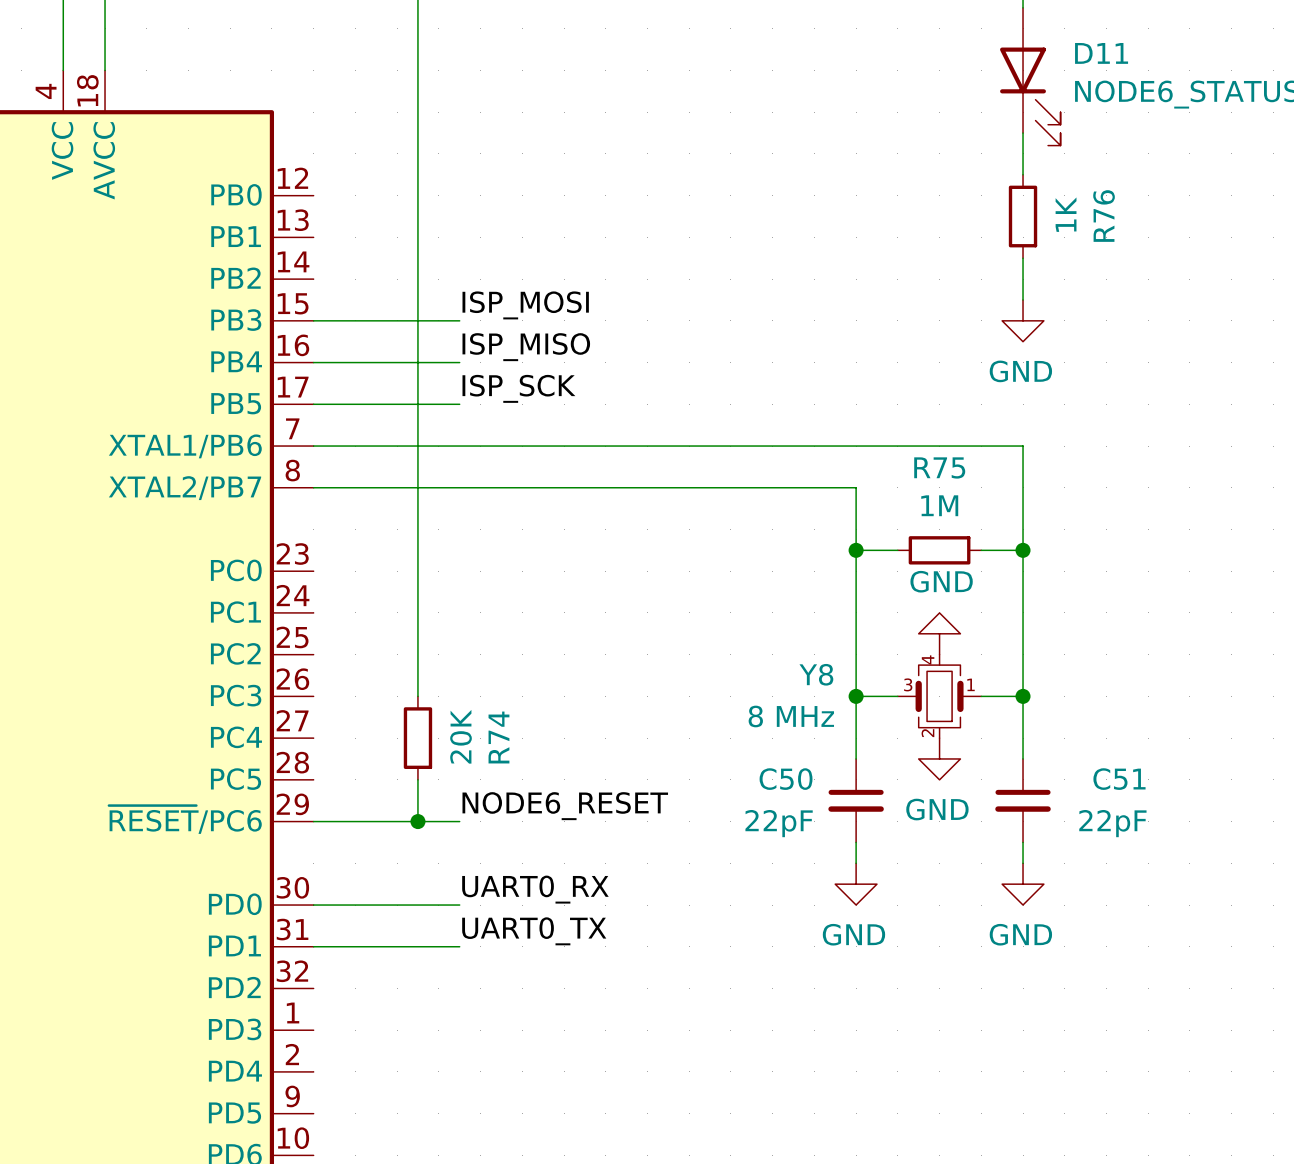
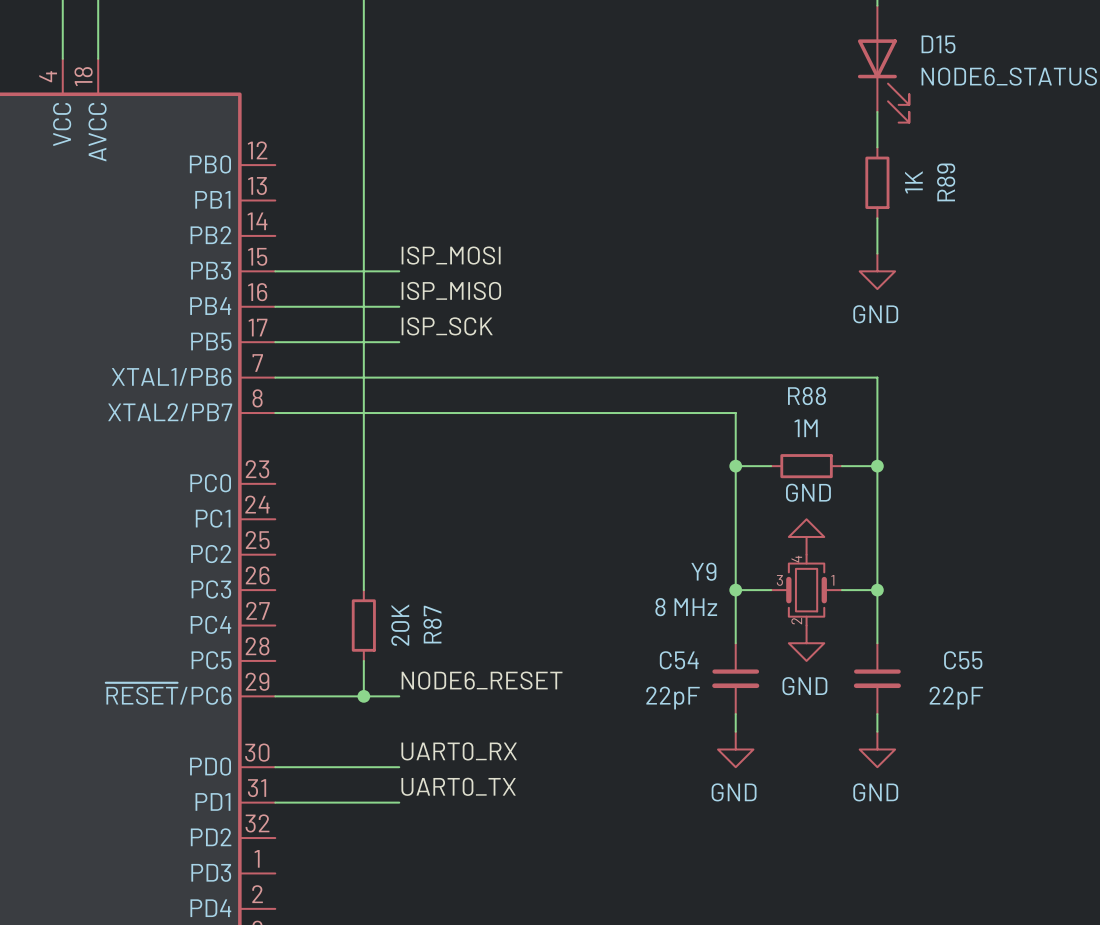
D11 name: D11 (1101, 53) -> D15 (938, 44)
R76 name: R76 (1104, 216) -> R89 (946, 182)
R75 name: R75 (939, 467) -> R88 (806, 396)
Y8 name: Y8 (816, 674) -> Y9 (703, 571)
R74 name: R74 (498, 737) -> R87 (432, 624)
C50 name: C50 (786, 779) -> C54 (679, 660)
C51 name: C51 (1119, 779) -> C55 (963, 660)

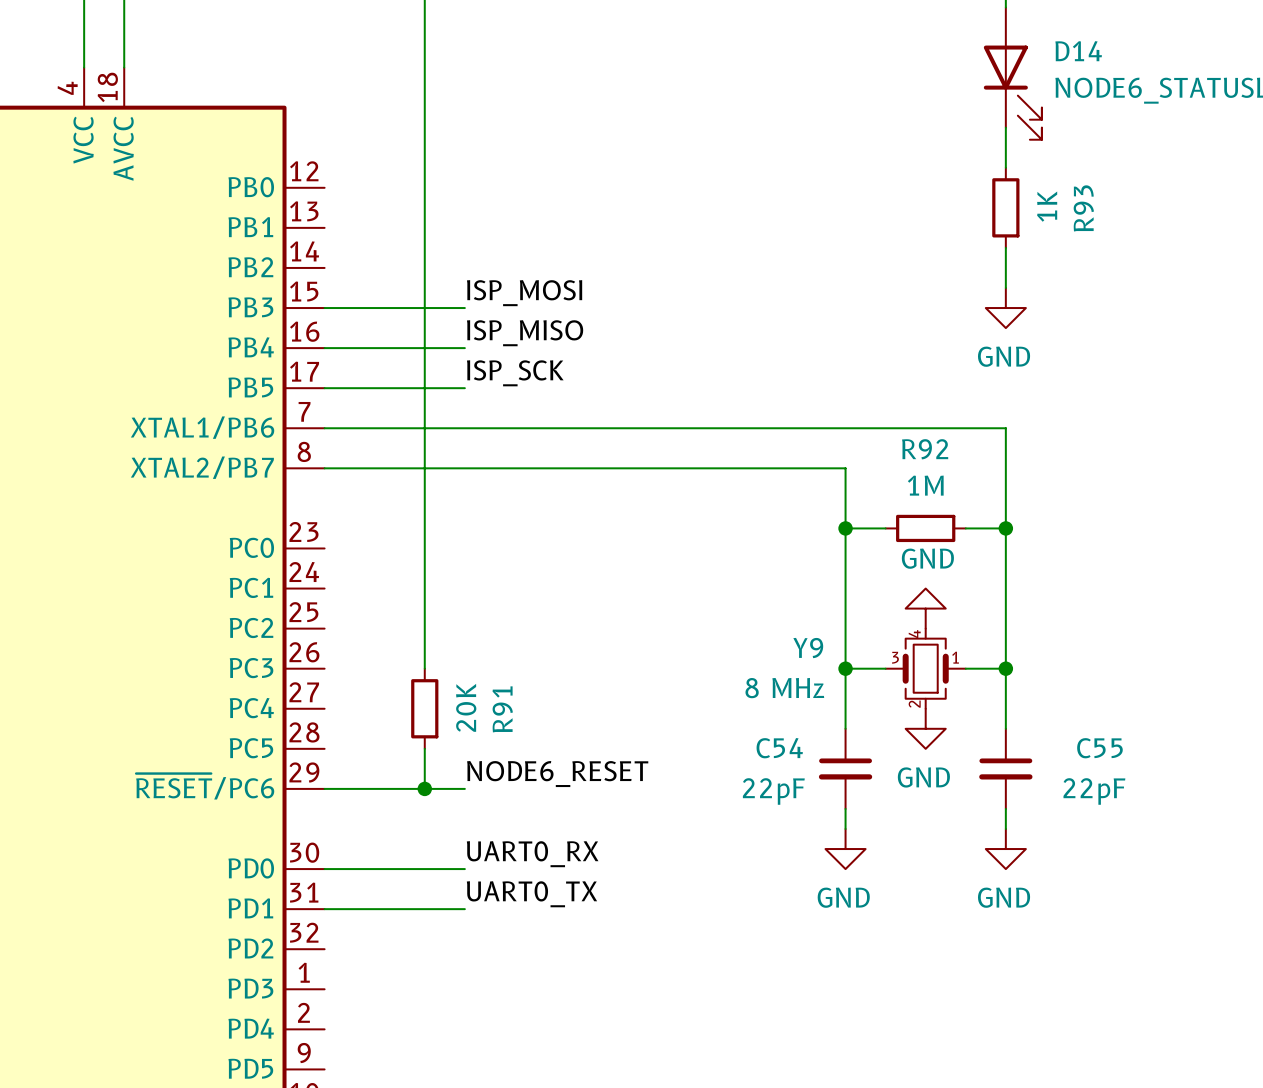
D15 name: D15 (938, 44) -> D14 (1078, 51)
R89 name: R89 (946, 182) -> R93 (1083, 208)
R88 name: R88 (806, 396) -> R92 (925, 449)
R87 name: R87 (432, 624) -> R91 (502, 709)

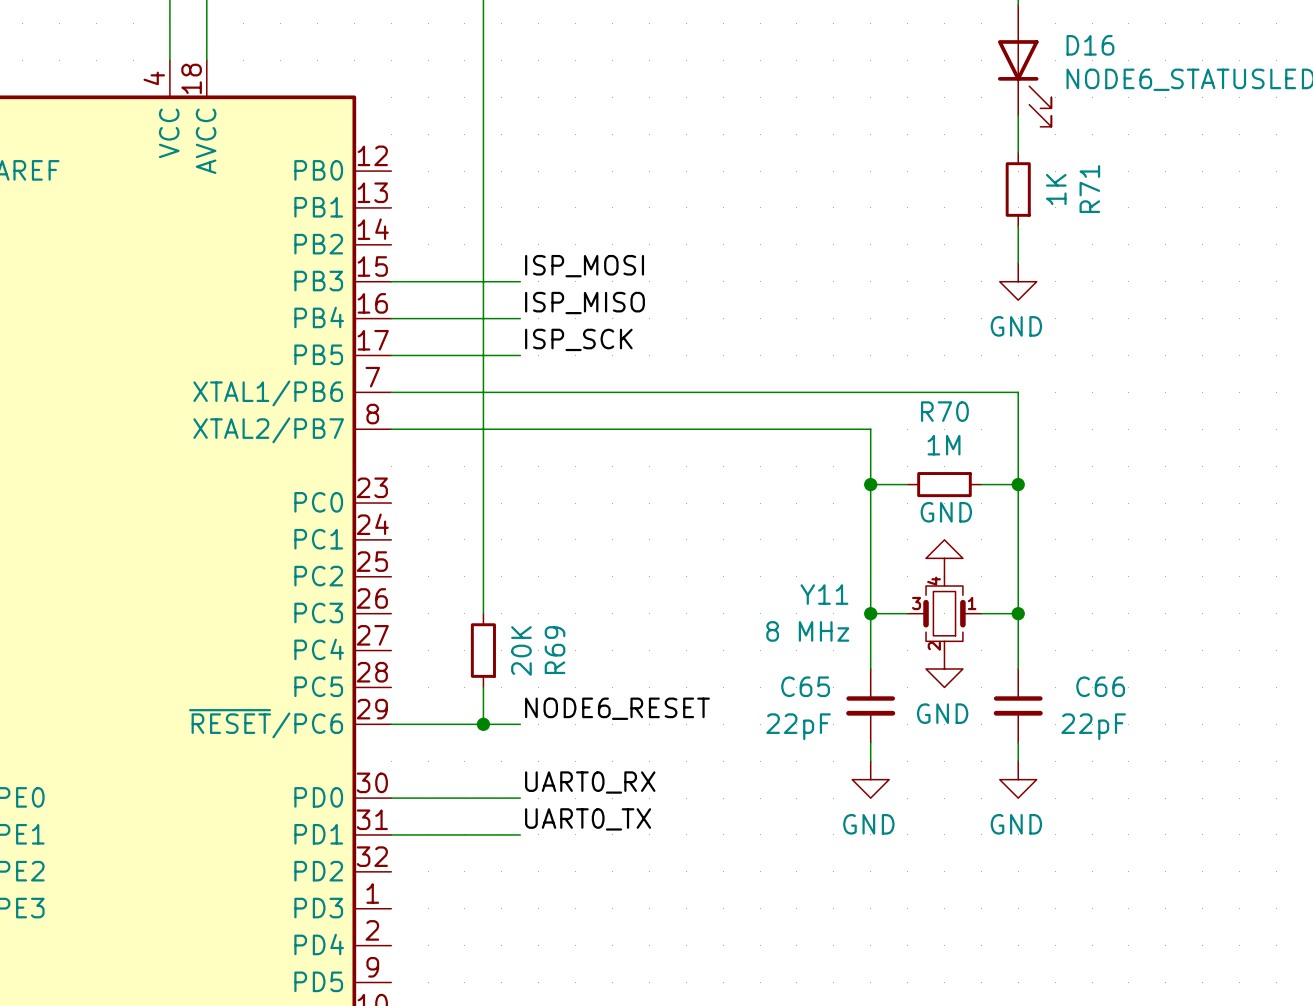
D14 name: D14 (1078, 51) -> D16 (1090, 45)
R93 name: R93 (1083, 208) -> R71 (1089, 189)
R92 name: R92 (925, 449) -> R70 (944, 411)
Y9 name: Y9 (808, 648) -> Y11 (824, 594)
R91 name: R91 (502, 709) -> R69 (555, 650)
C54 name: C54 (779, 748) -> C65 (805, 686)
C55 name: C55 (1099, 748) -> C66 (1100, 686)

